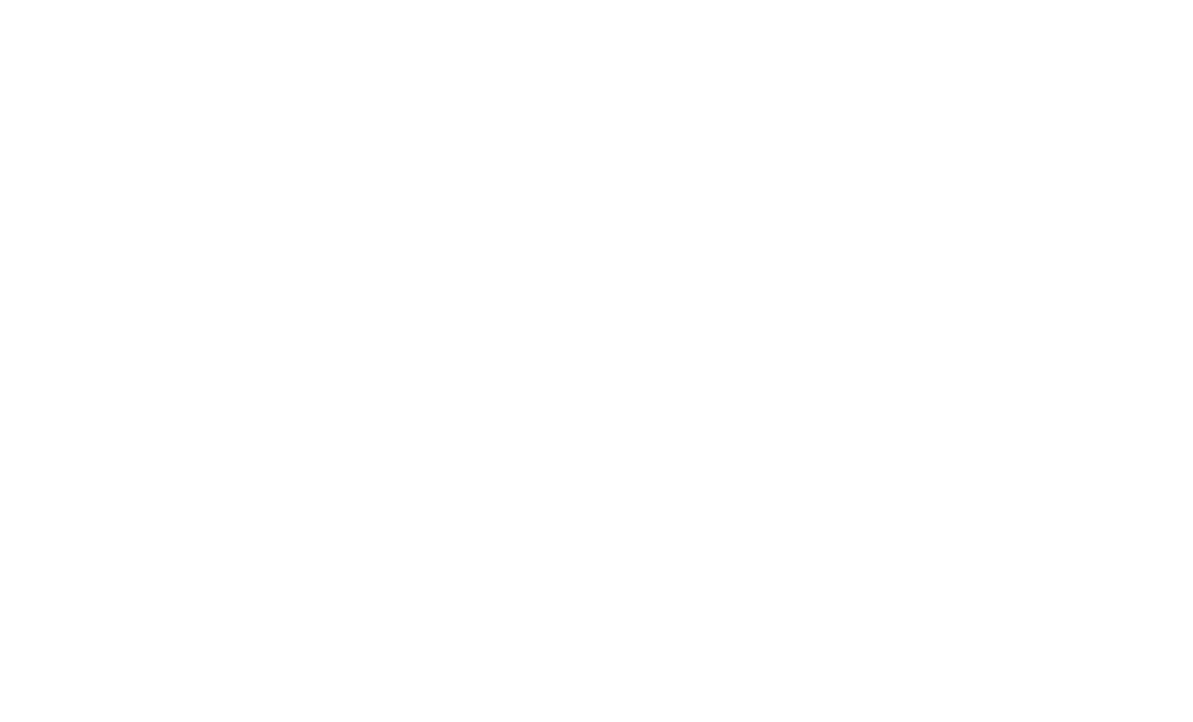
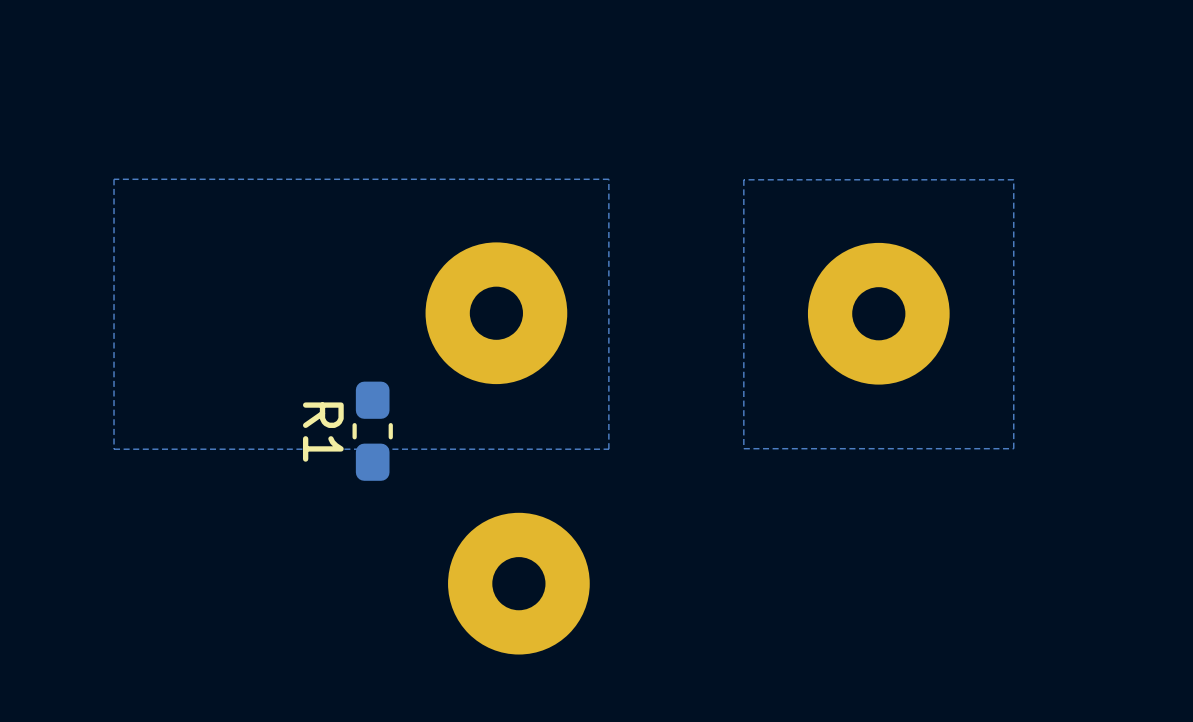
zone outline: none -> (608, 179) (608, 449) (114, 449) (114, 179) (608, 179)
zone outline: none -> (1013, 179) (1013, 448) (743, 448) (743, 179) (1013, 179)
part: none -> (496, 313)
part: none -> (878, 313)
R1: none -> (372, 431)
part: none -> (518, 583)

